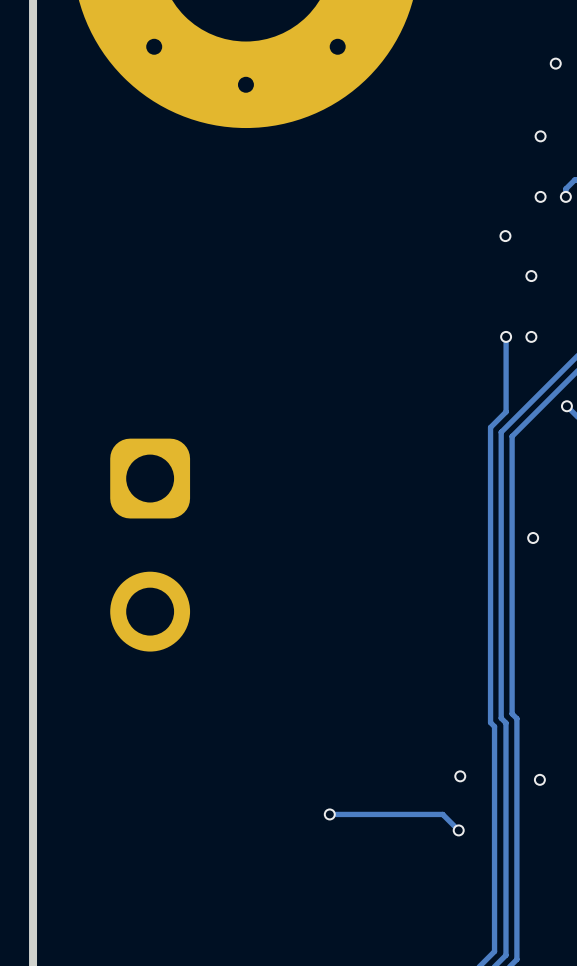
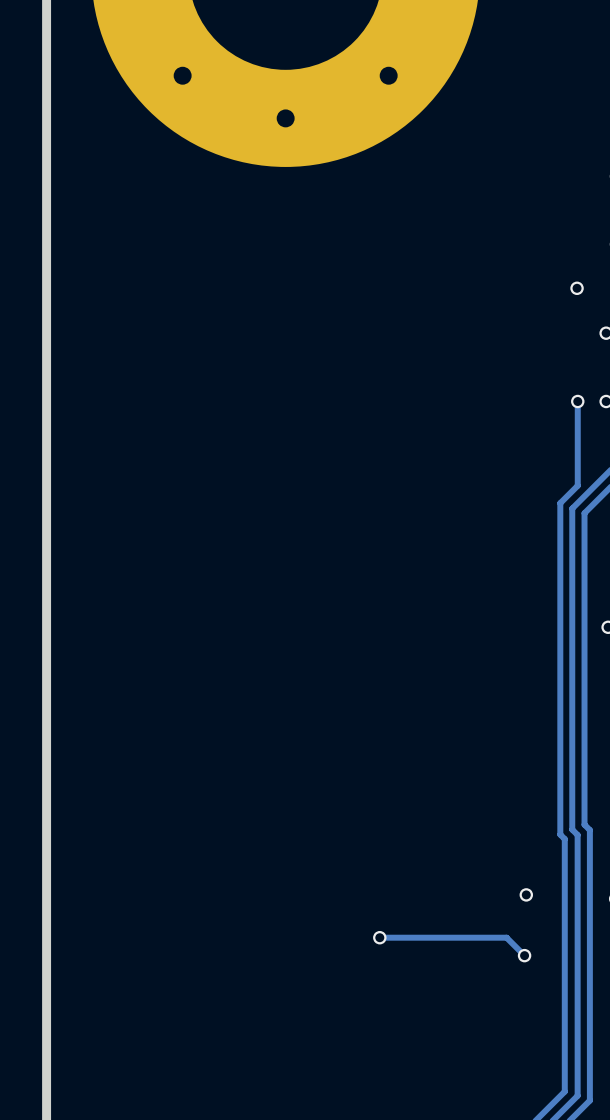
part: (150, 545) -> none

